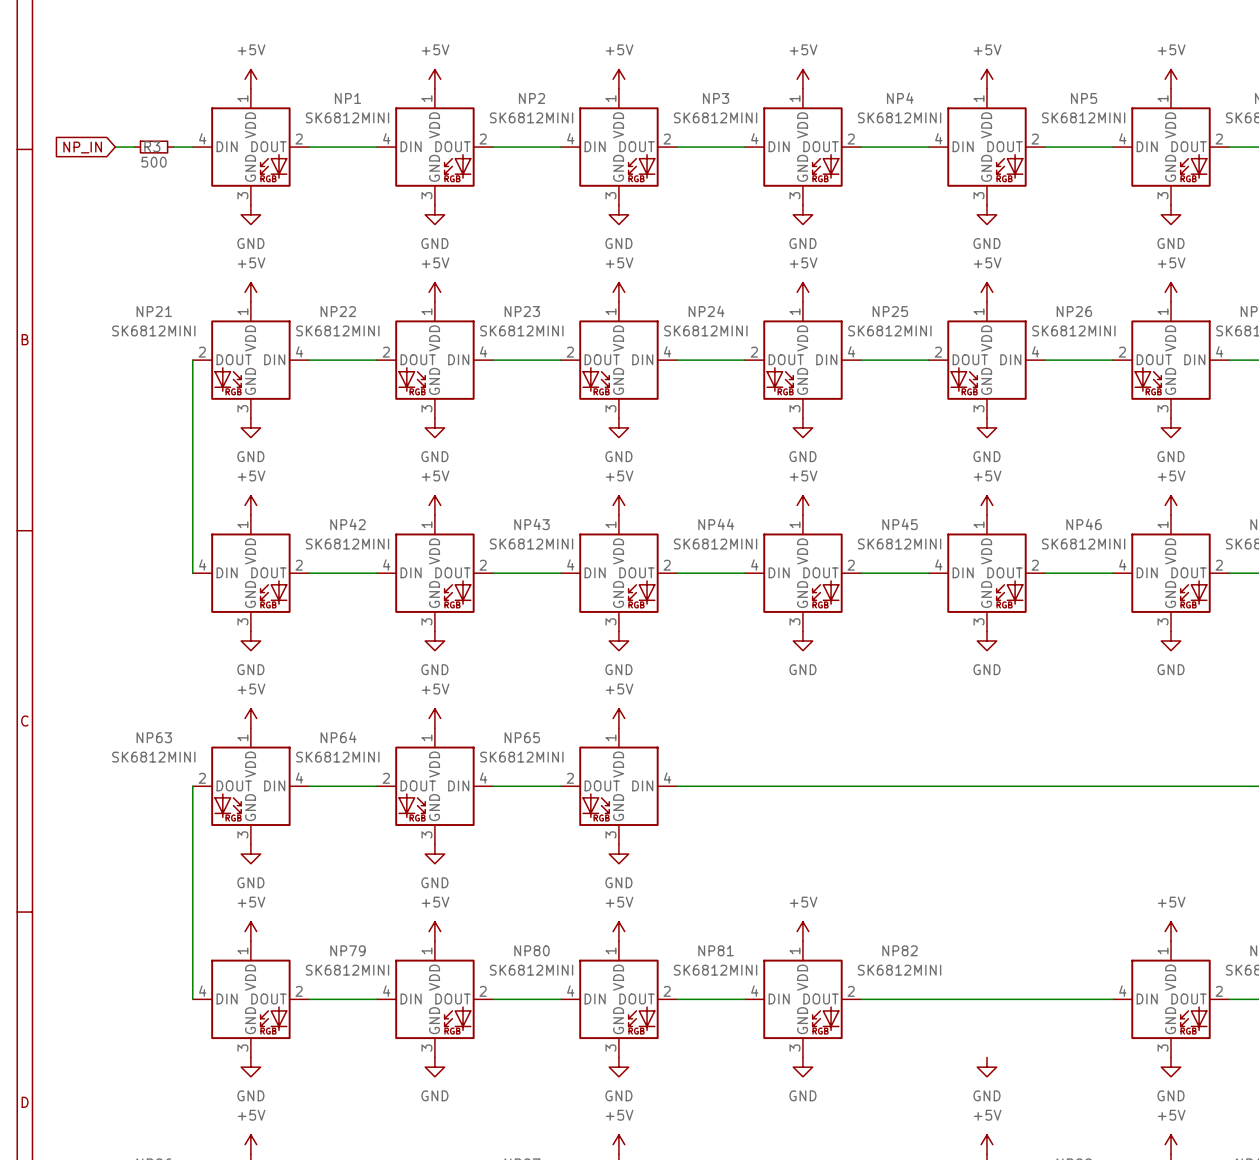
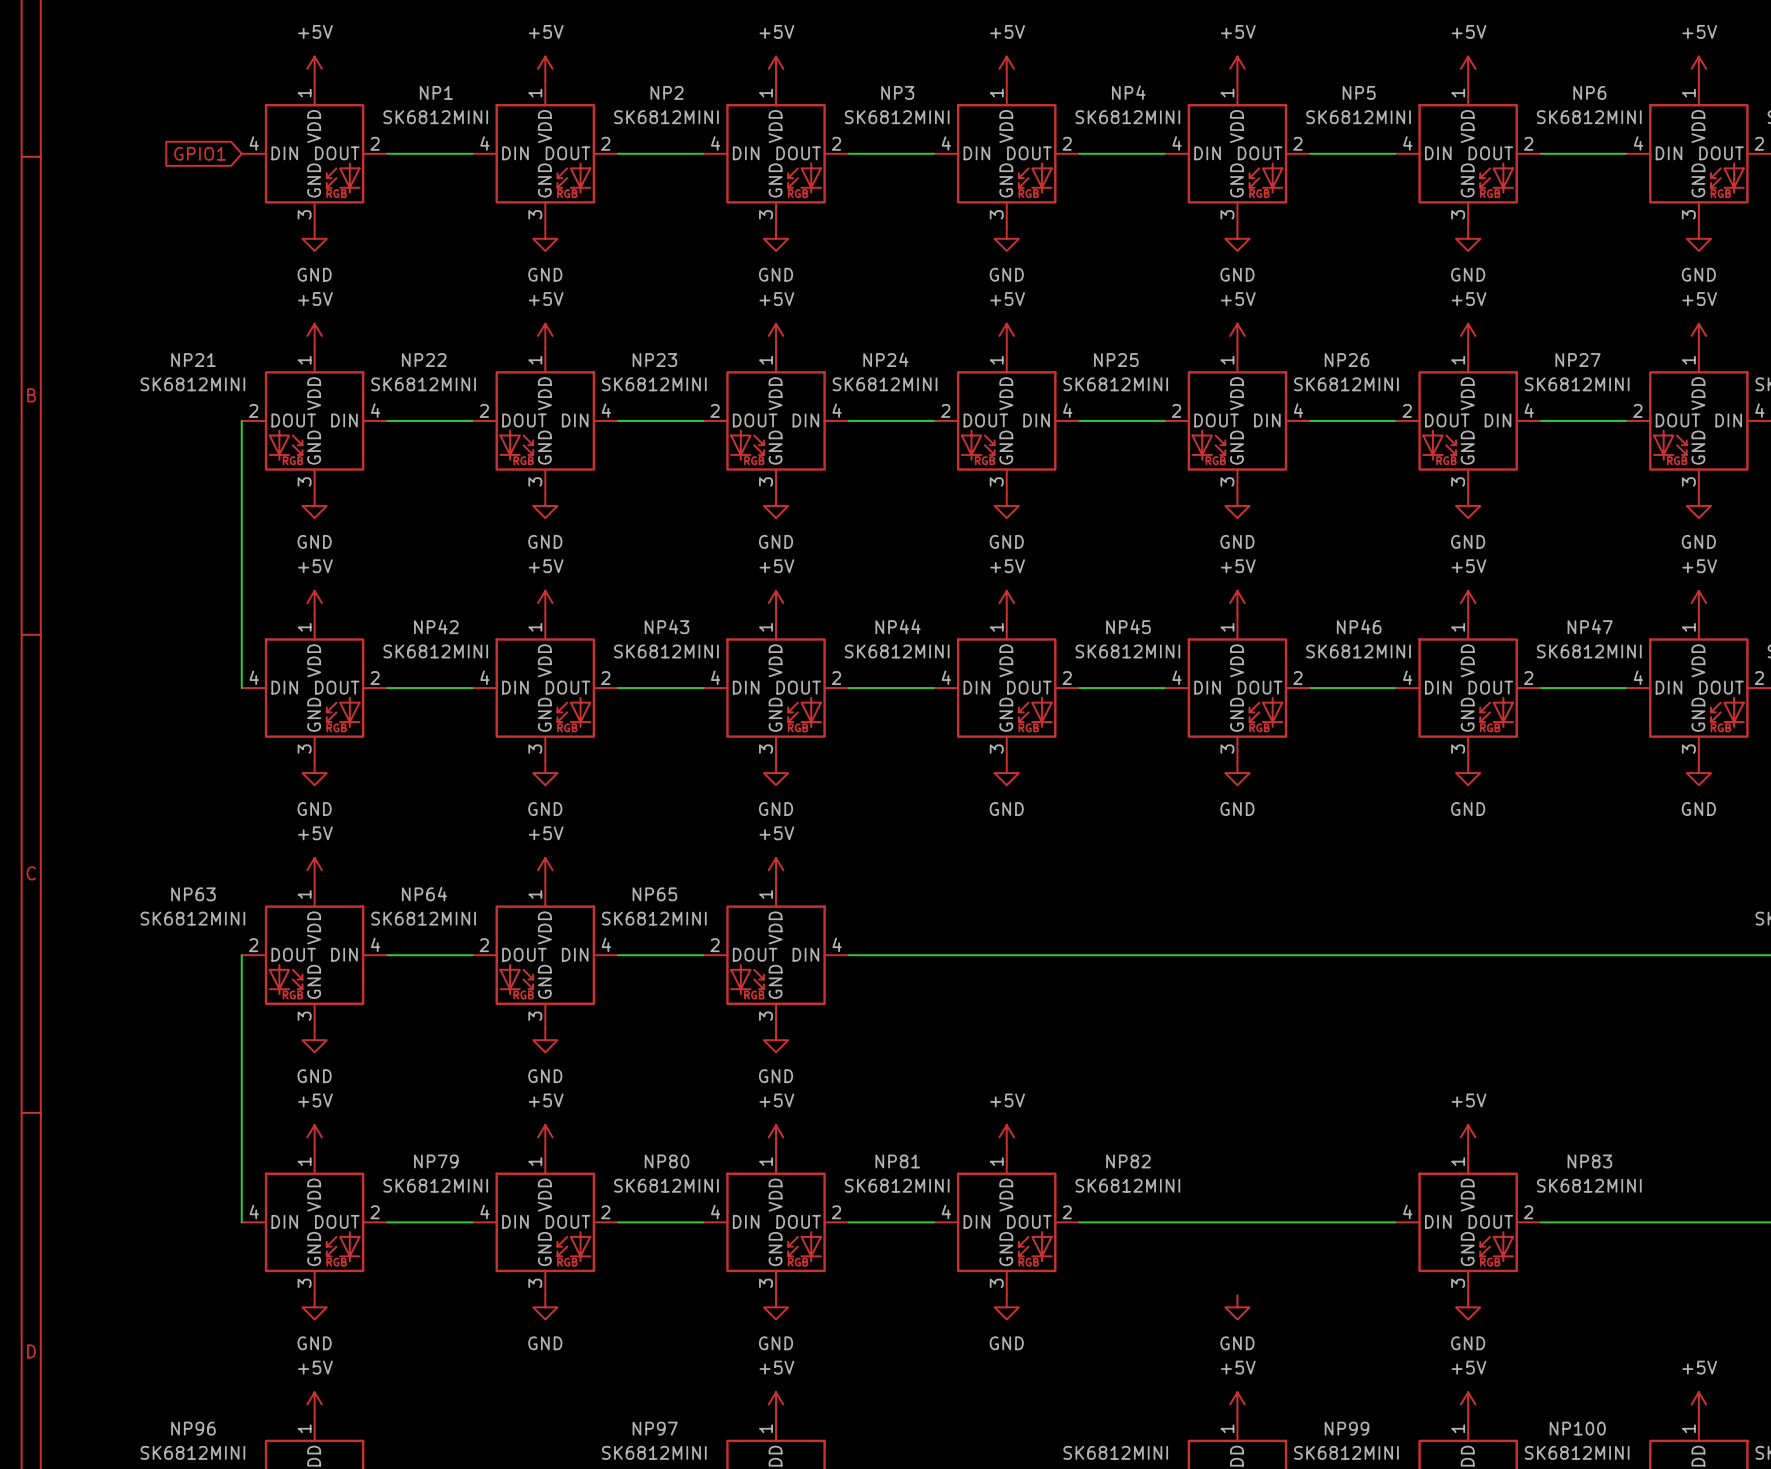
global label: NP_IN (82, 147) -> none
wire: (115, 147) (134, 147) -> none
R3: 500 (154, 147) -> none
global label: none -> GPIO1 (199, 153)
wire: (173, 147) (192, 147) -> none

